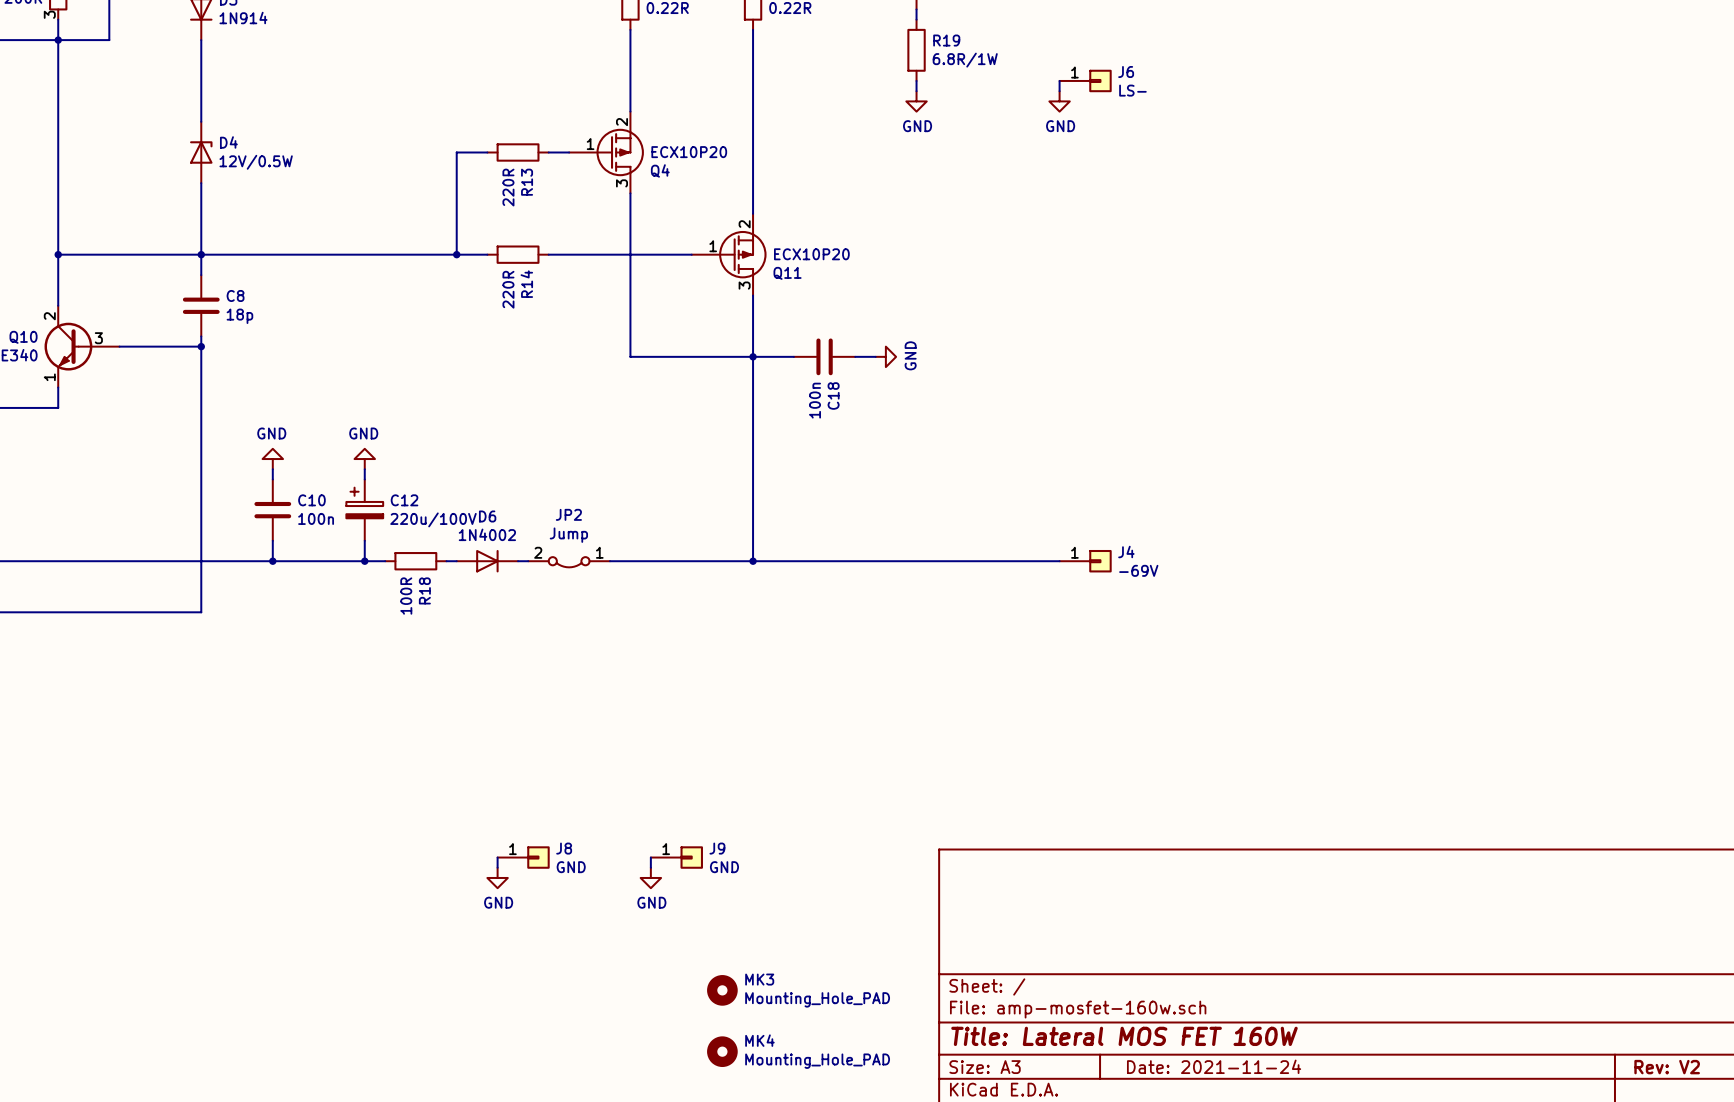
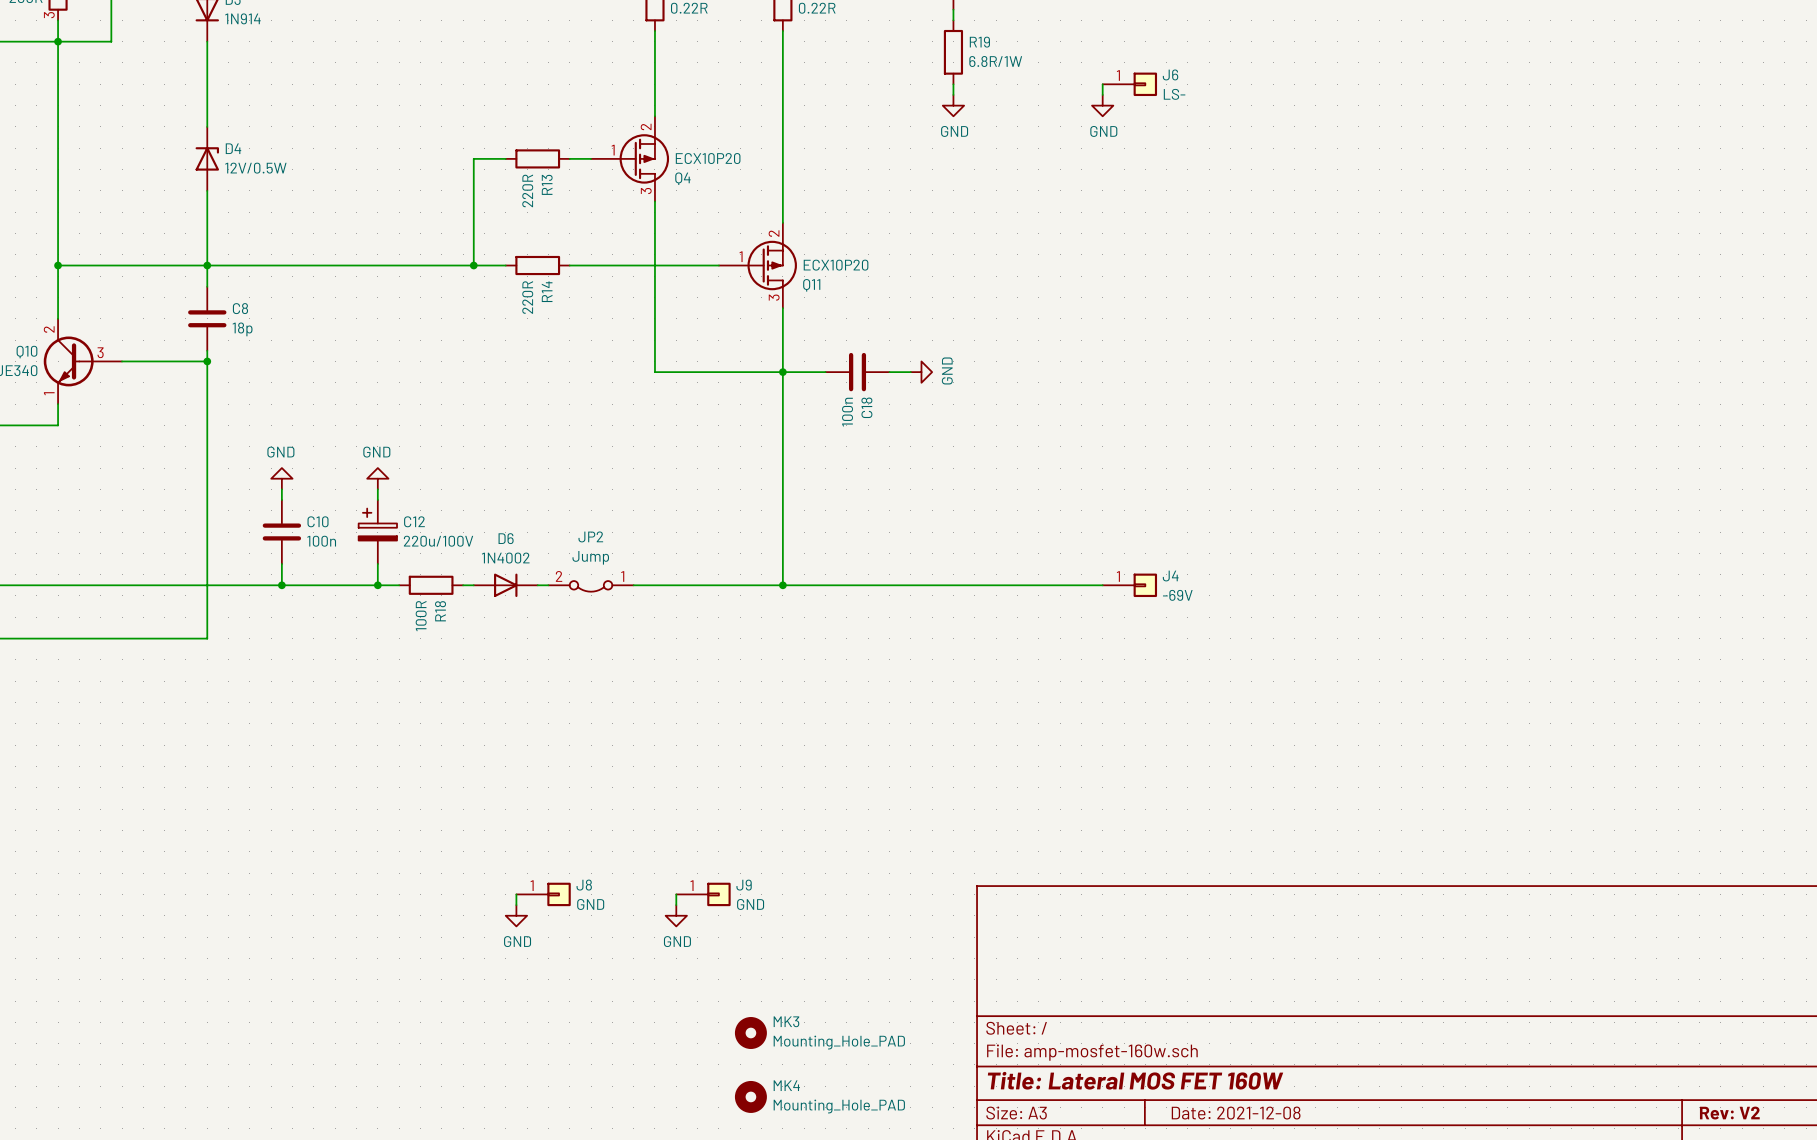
title block: Date: 2021-11-24 (1214, 1066) -> Date: 2021-12-08 (1236, 1113)

